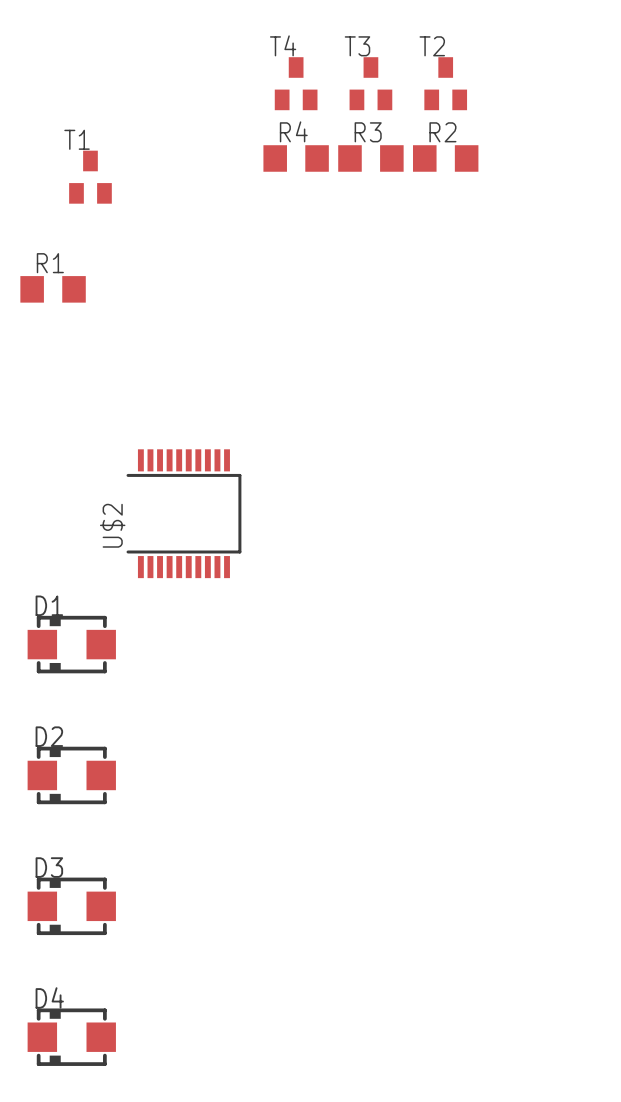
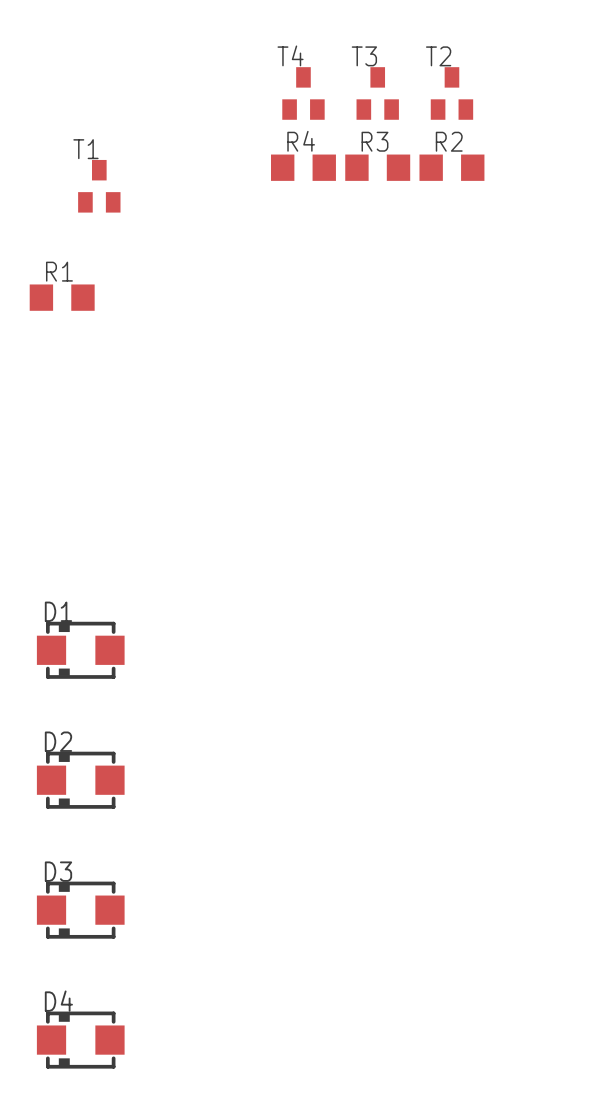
U$2: (183, 513) -> none

